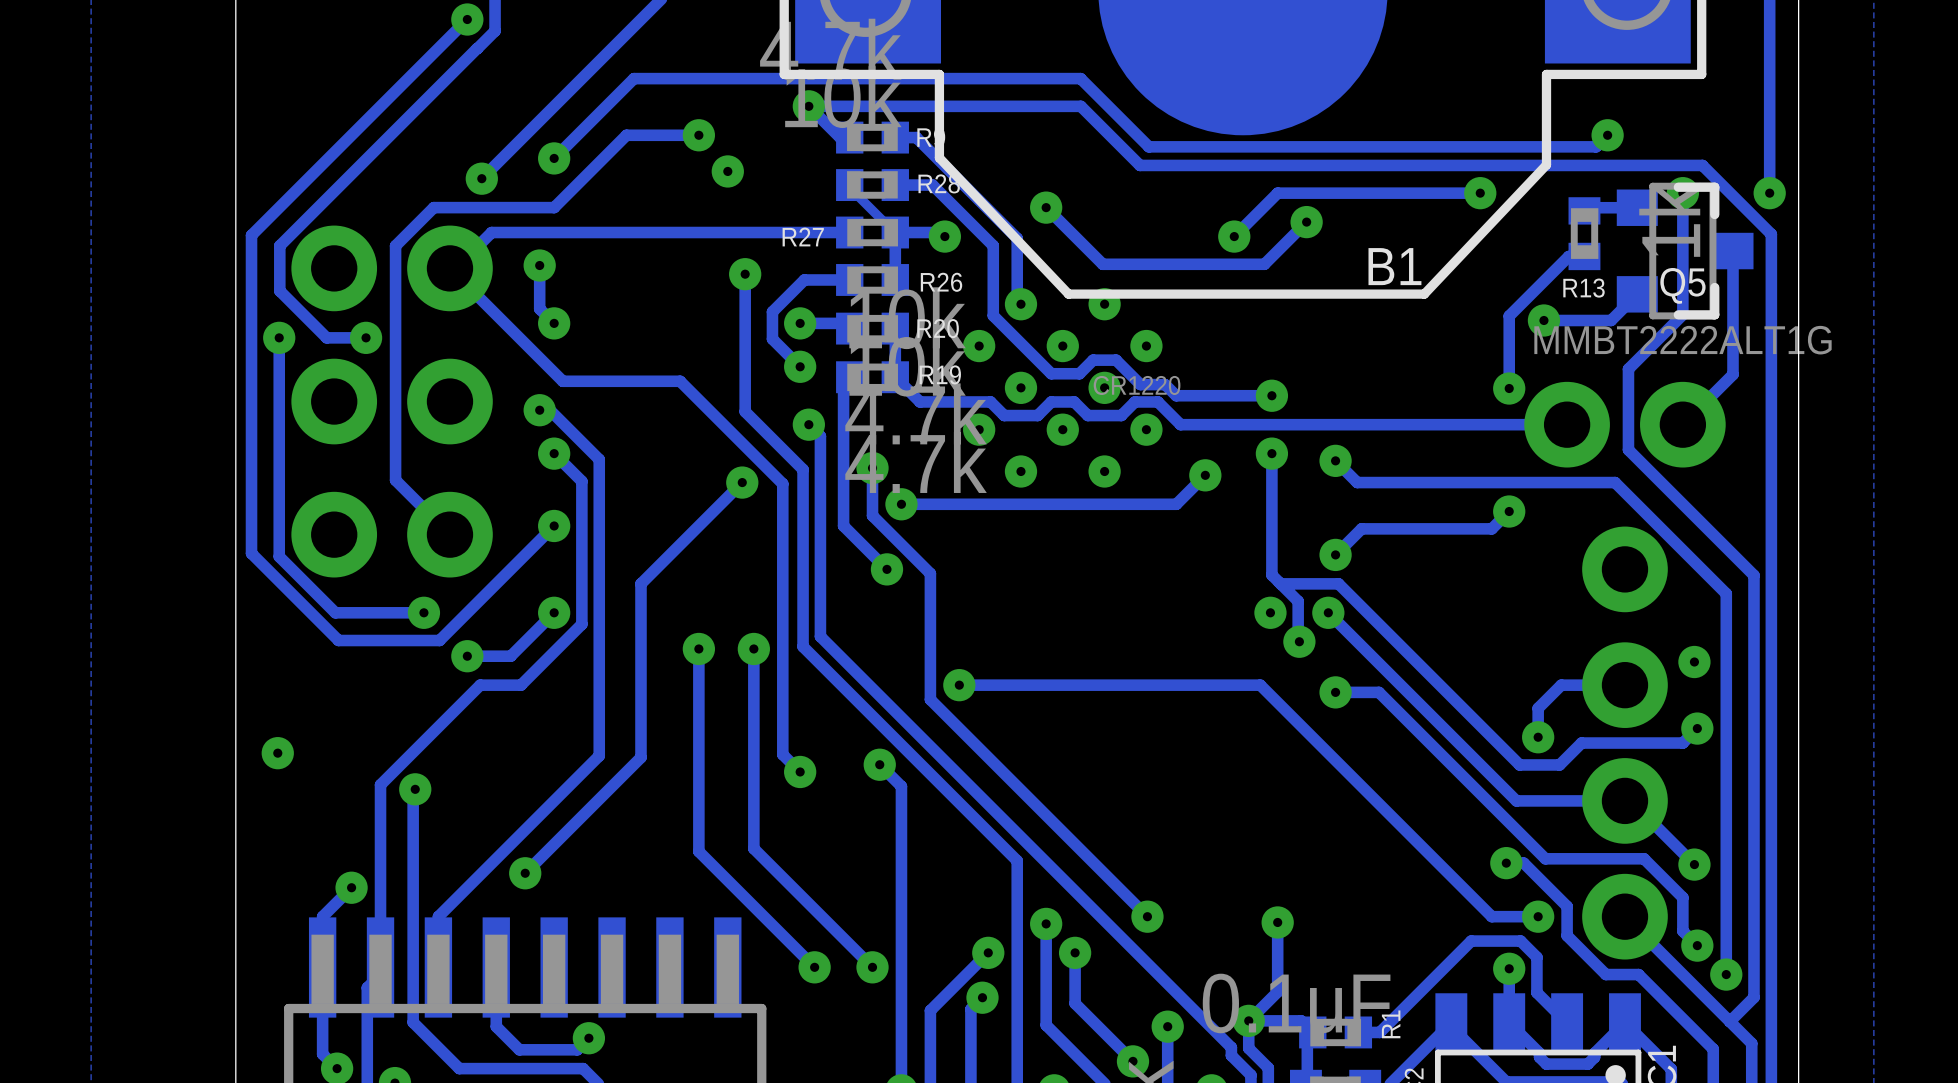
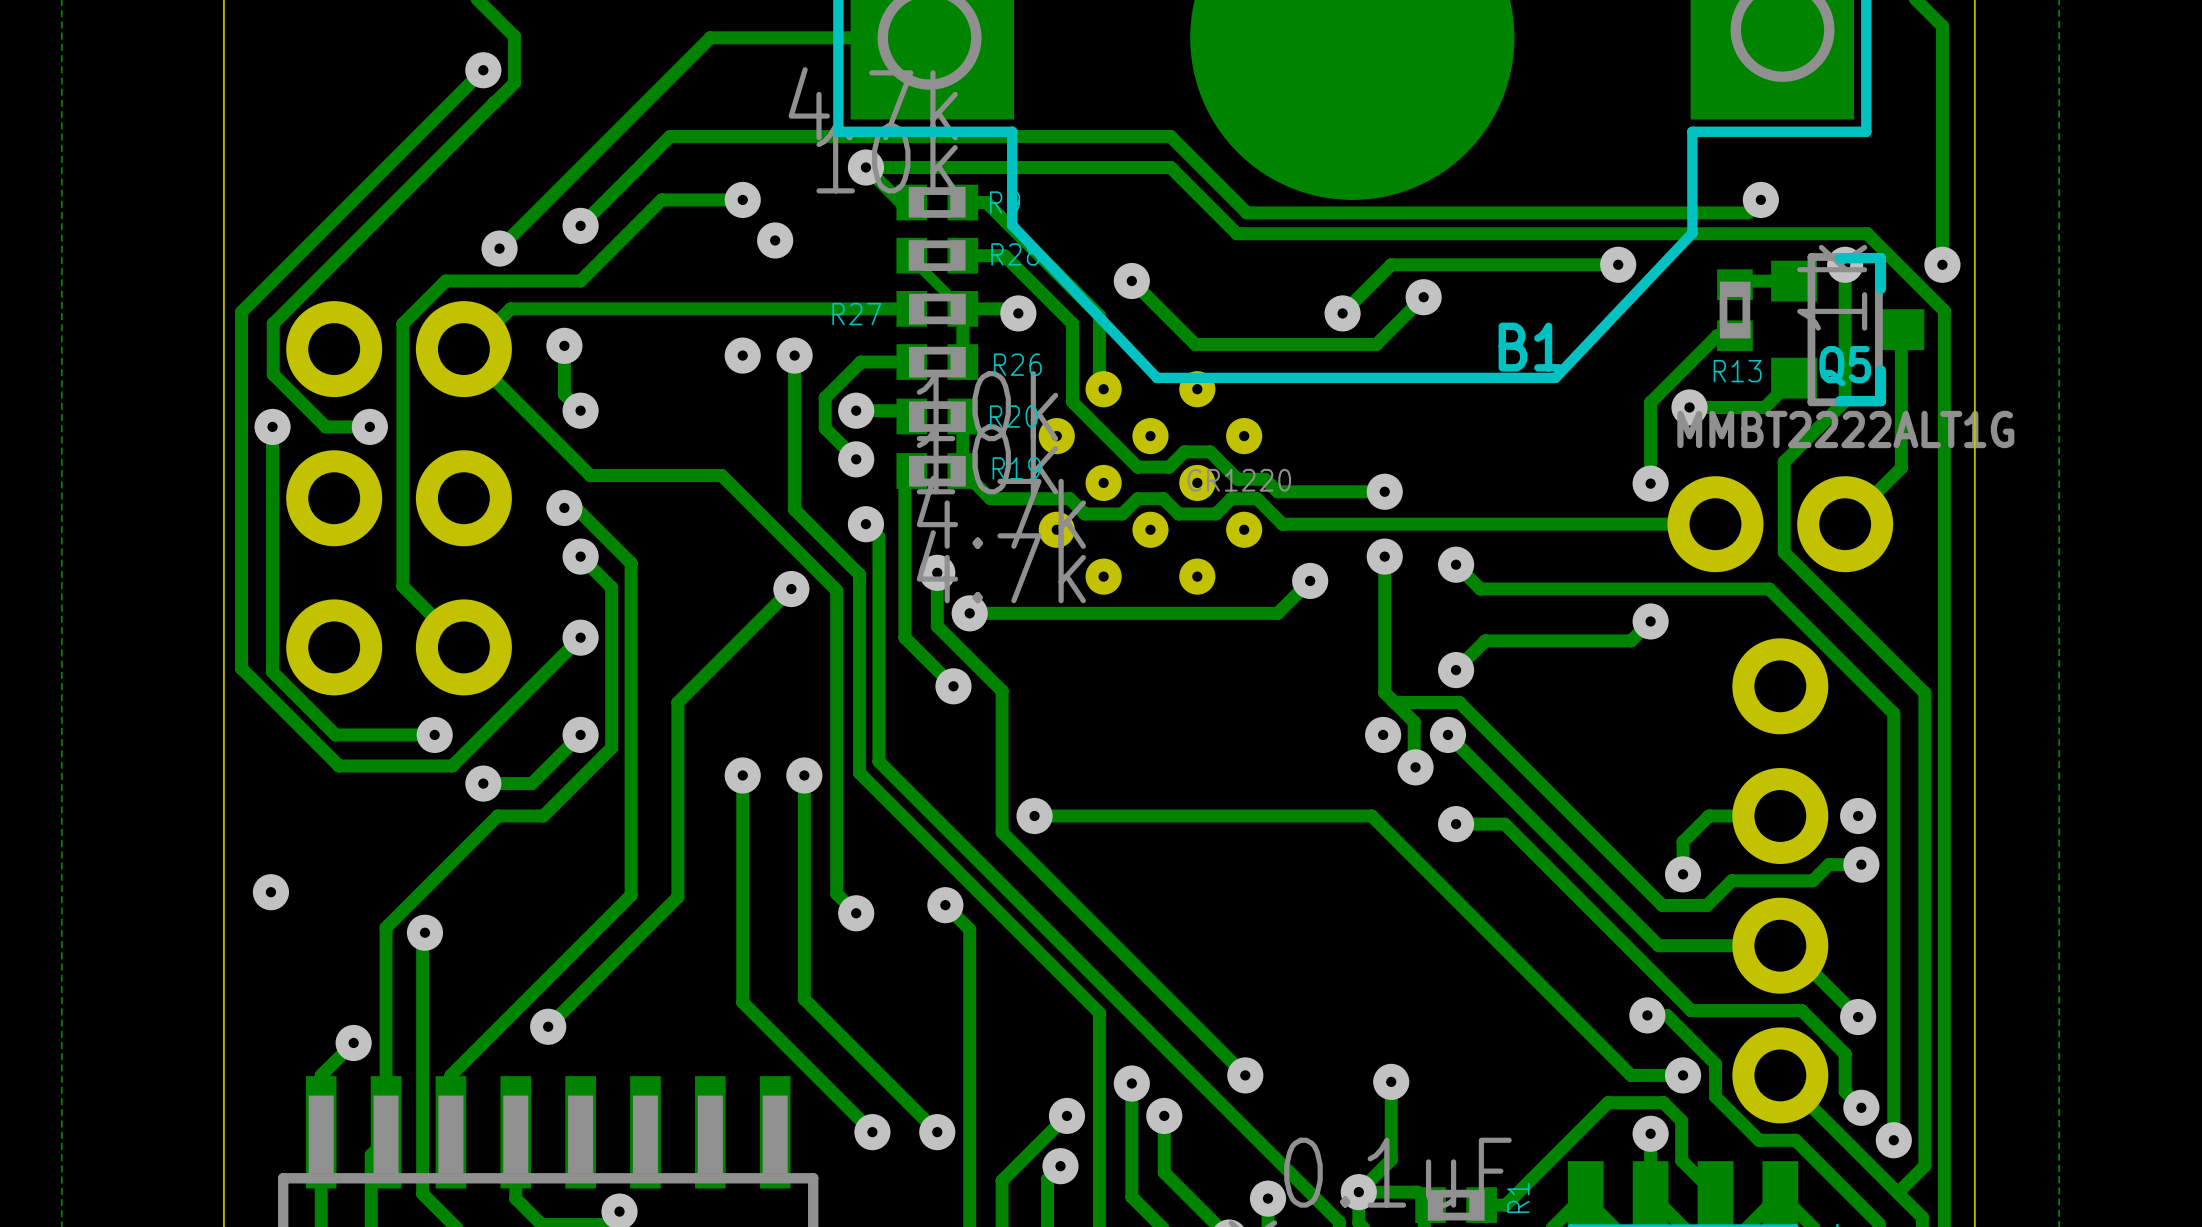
via: none -> (742, 355)
via position: (1694, 662) -> (1858, 816)
track: (1697, 728) (1682, 743) (1653, 743) -> (1861, 864) (1828, 864) (1812, 880)

